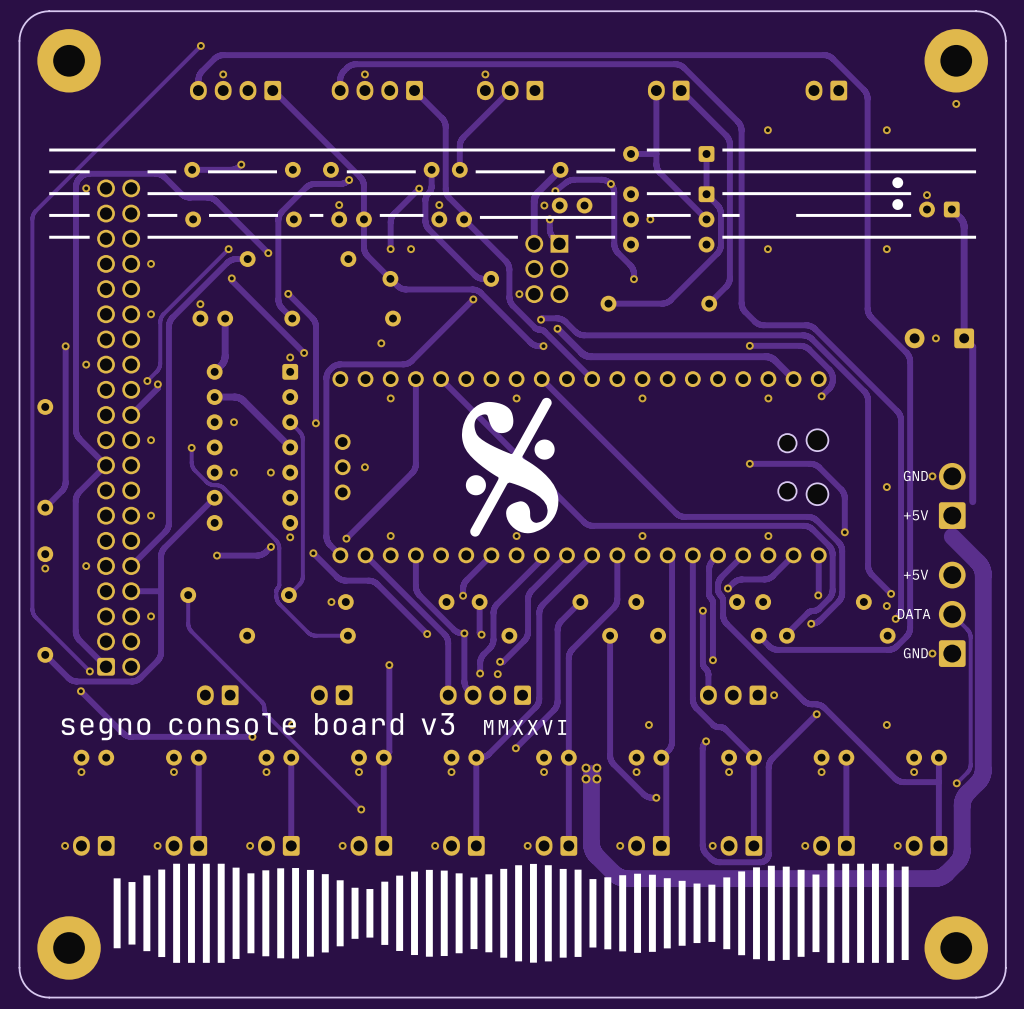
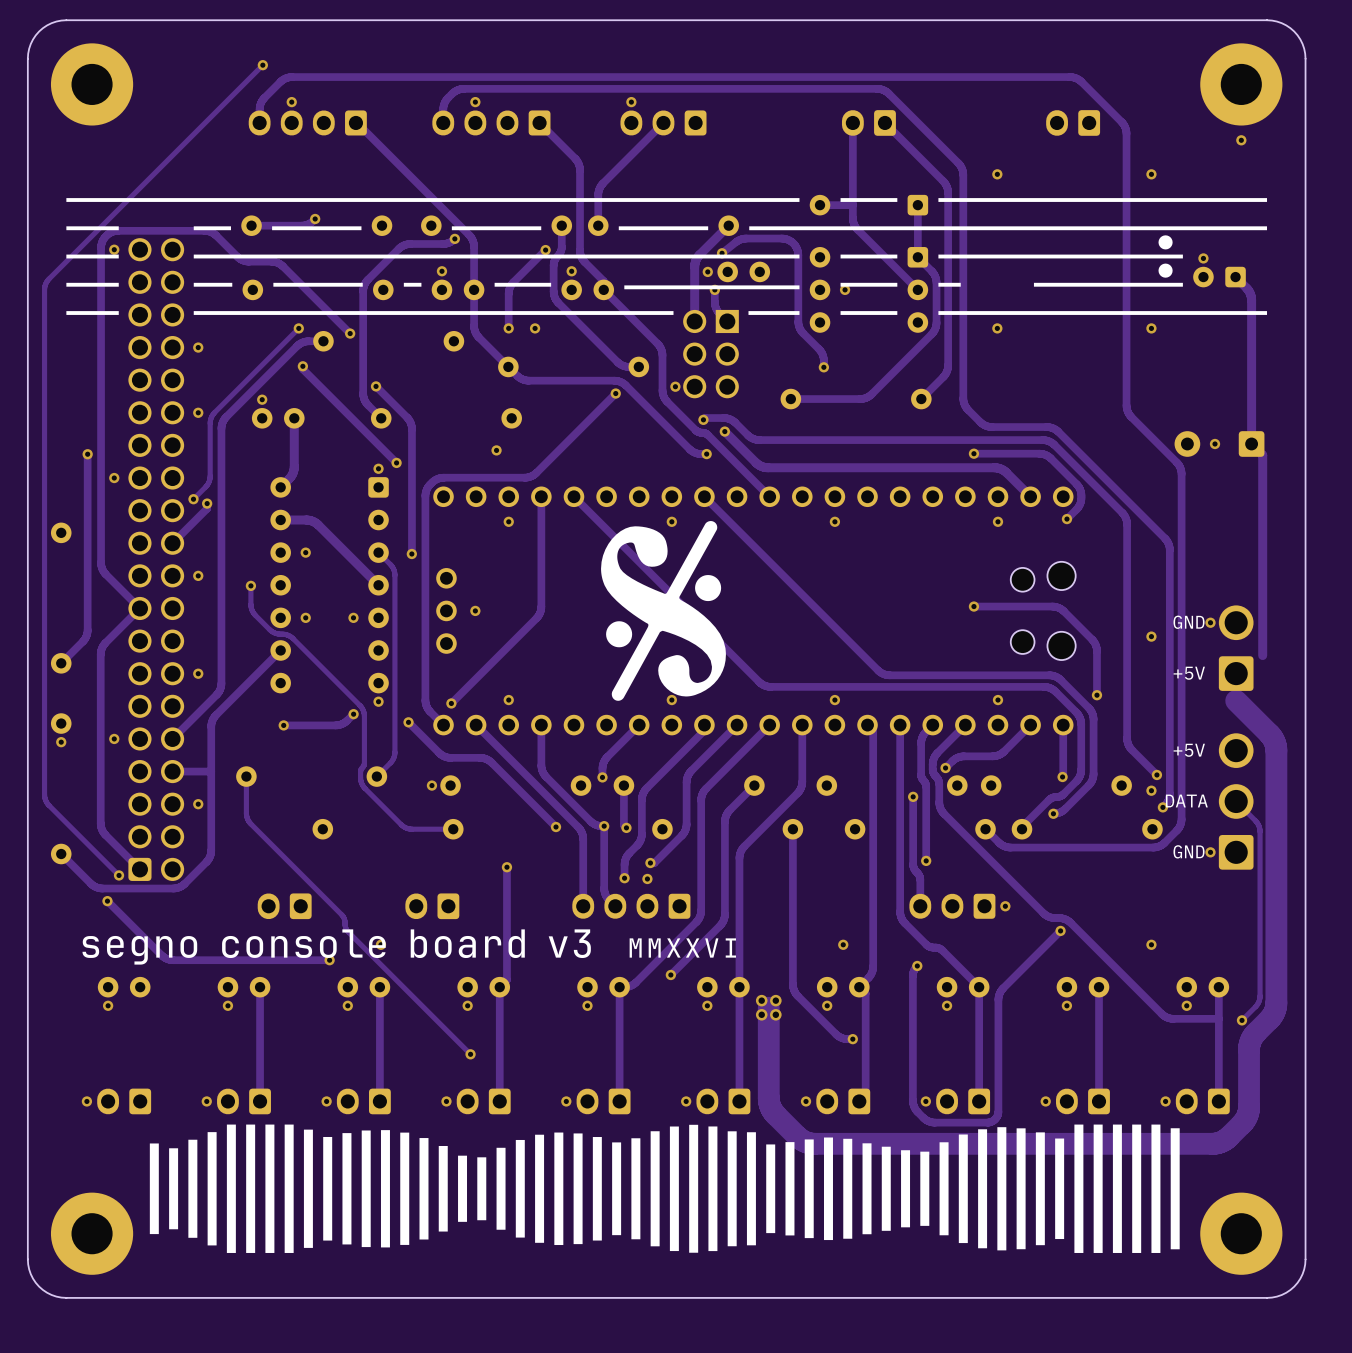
via: (610, 184) -> none

